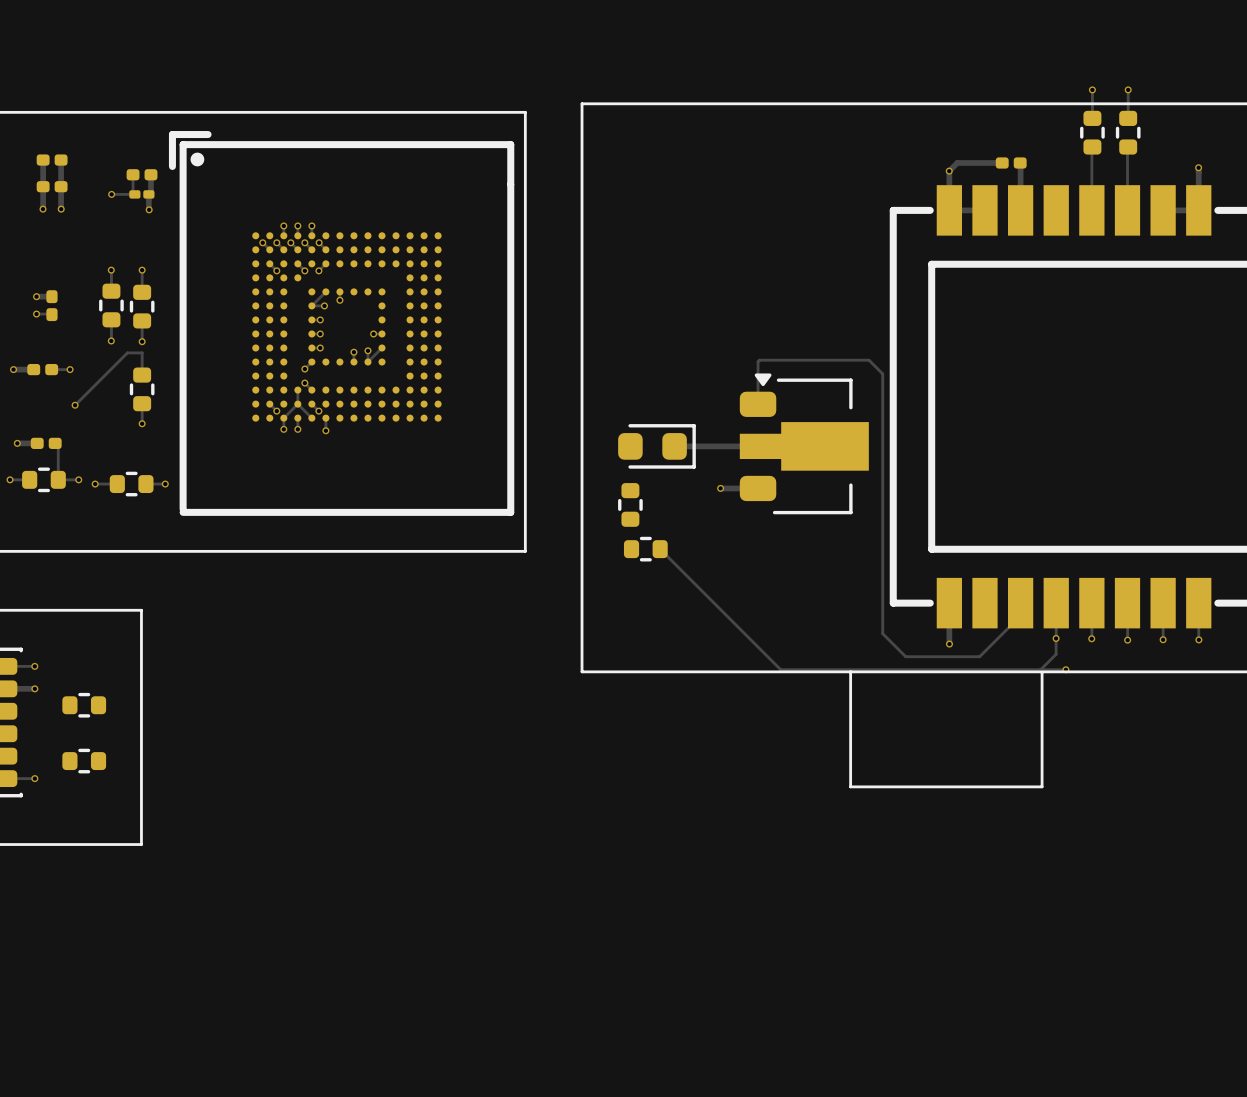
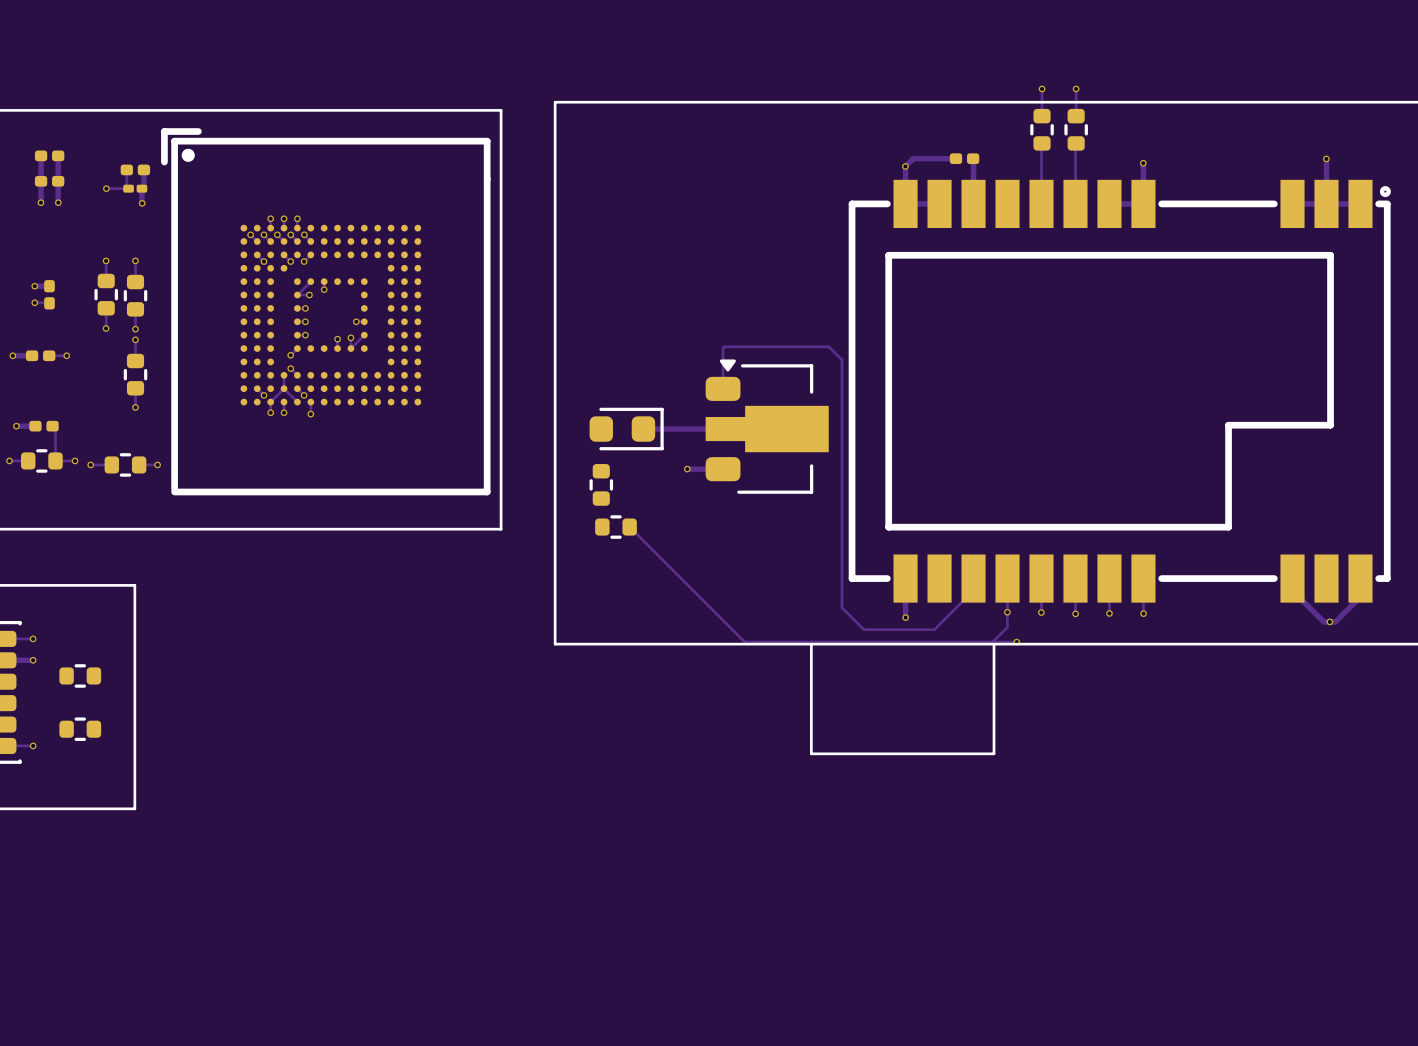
track: (142, 352) (127, 352) (75, 405) -> none
via position: (75, 405) -> (135, 339)

